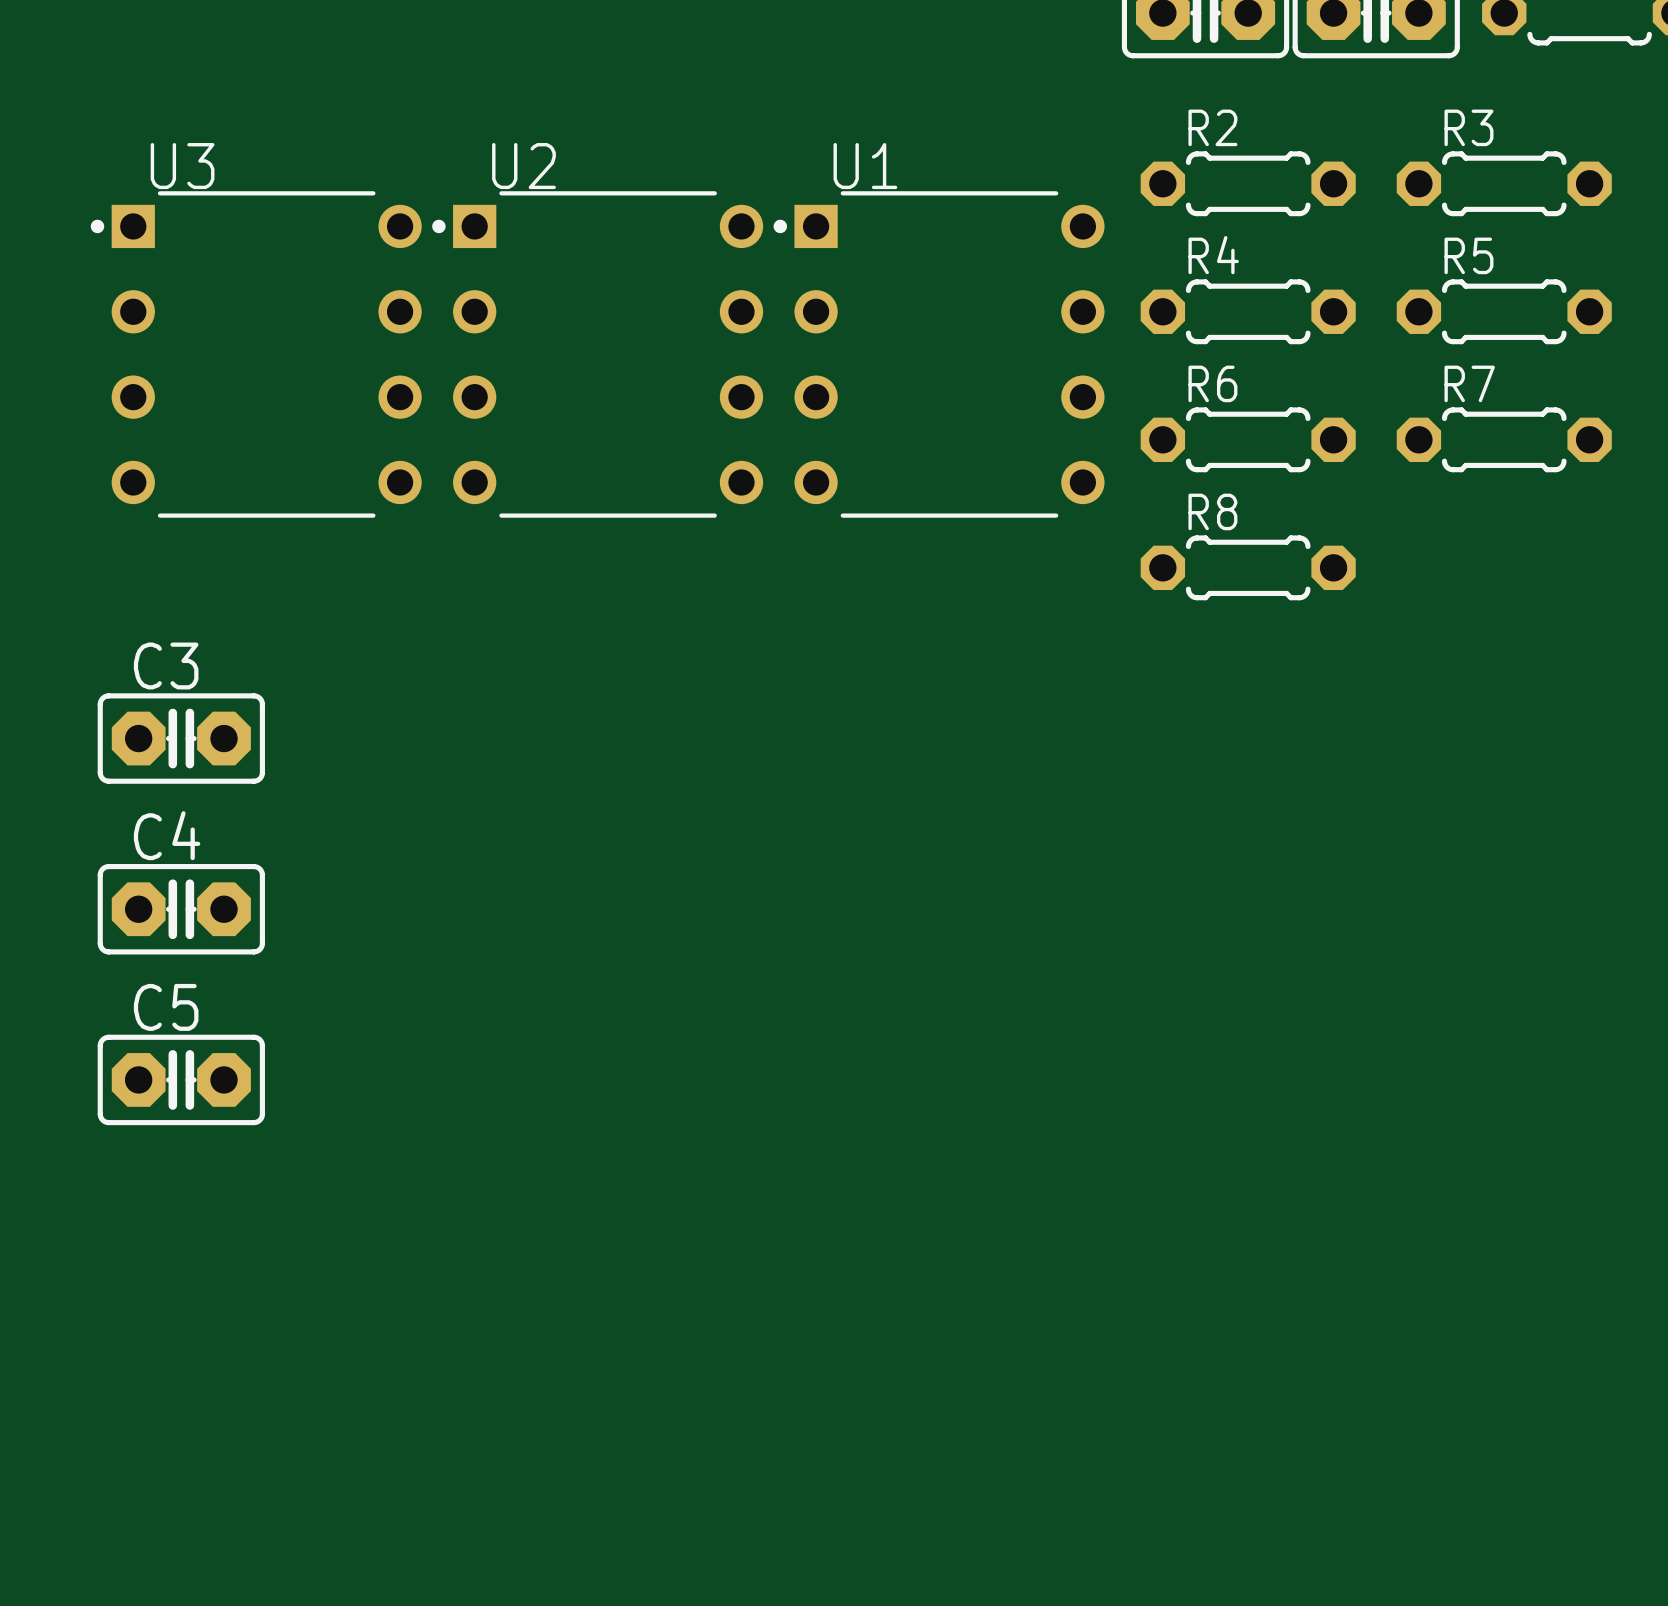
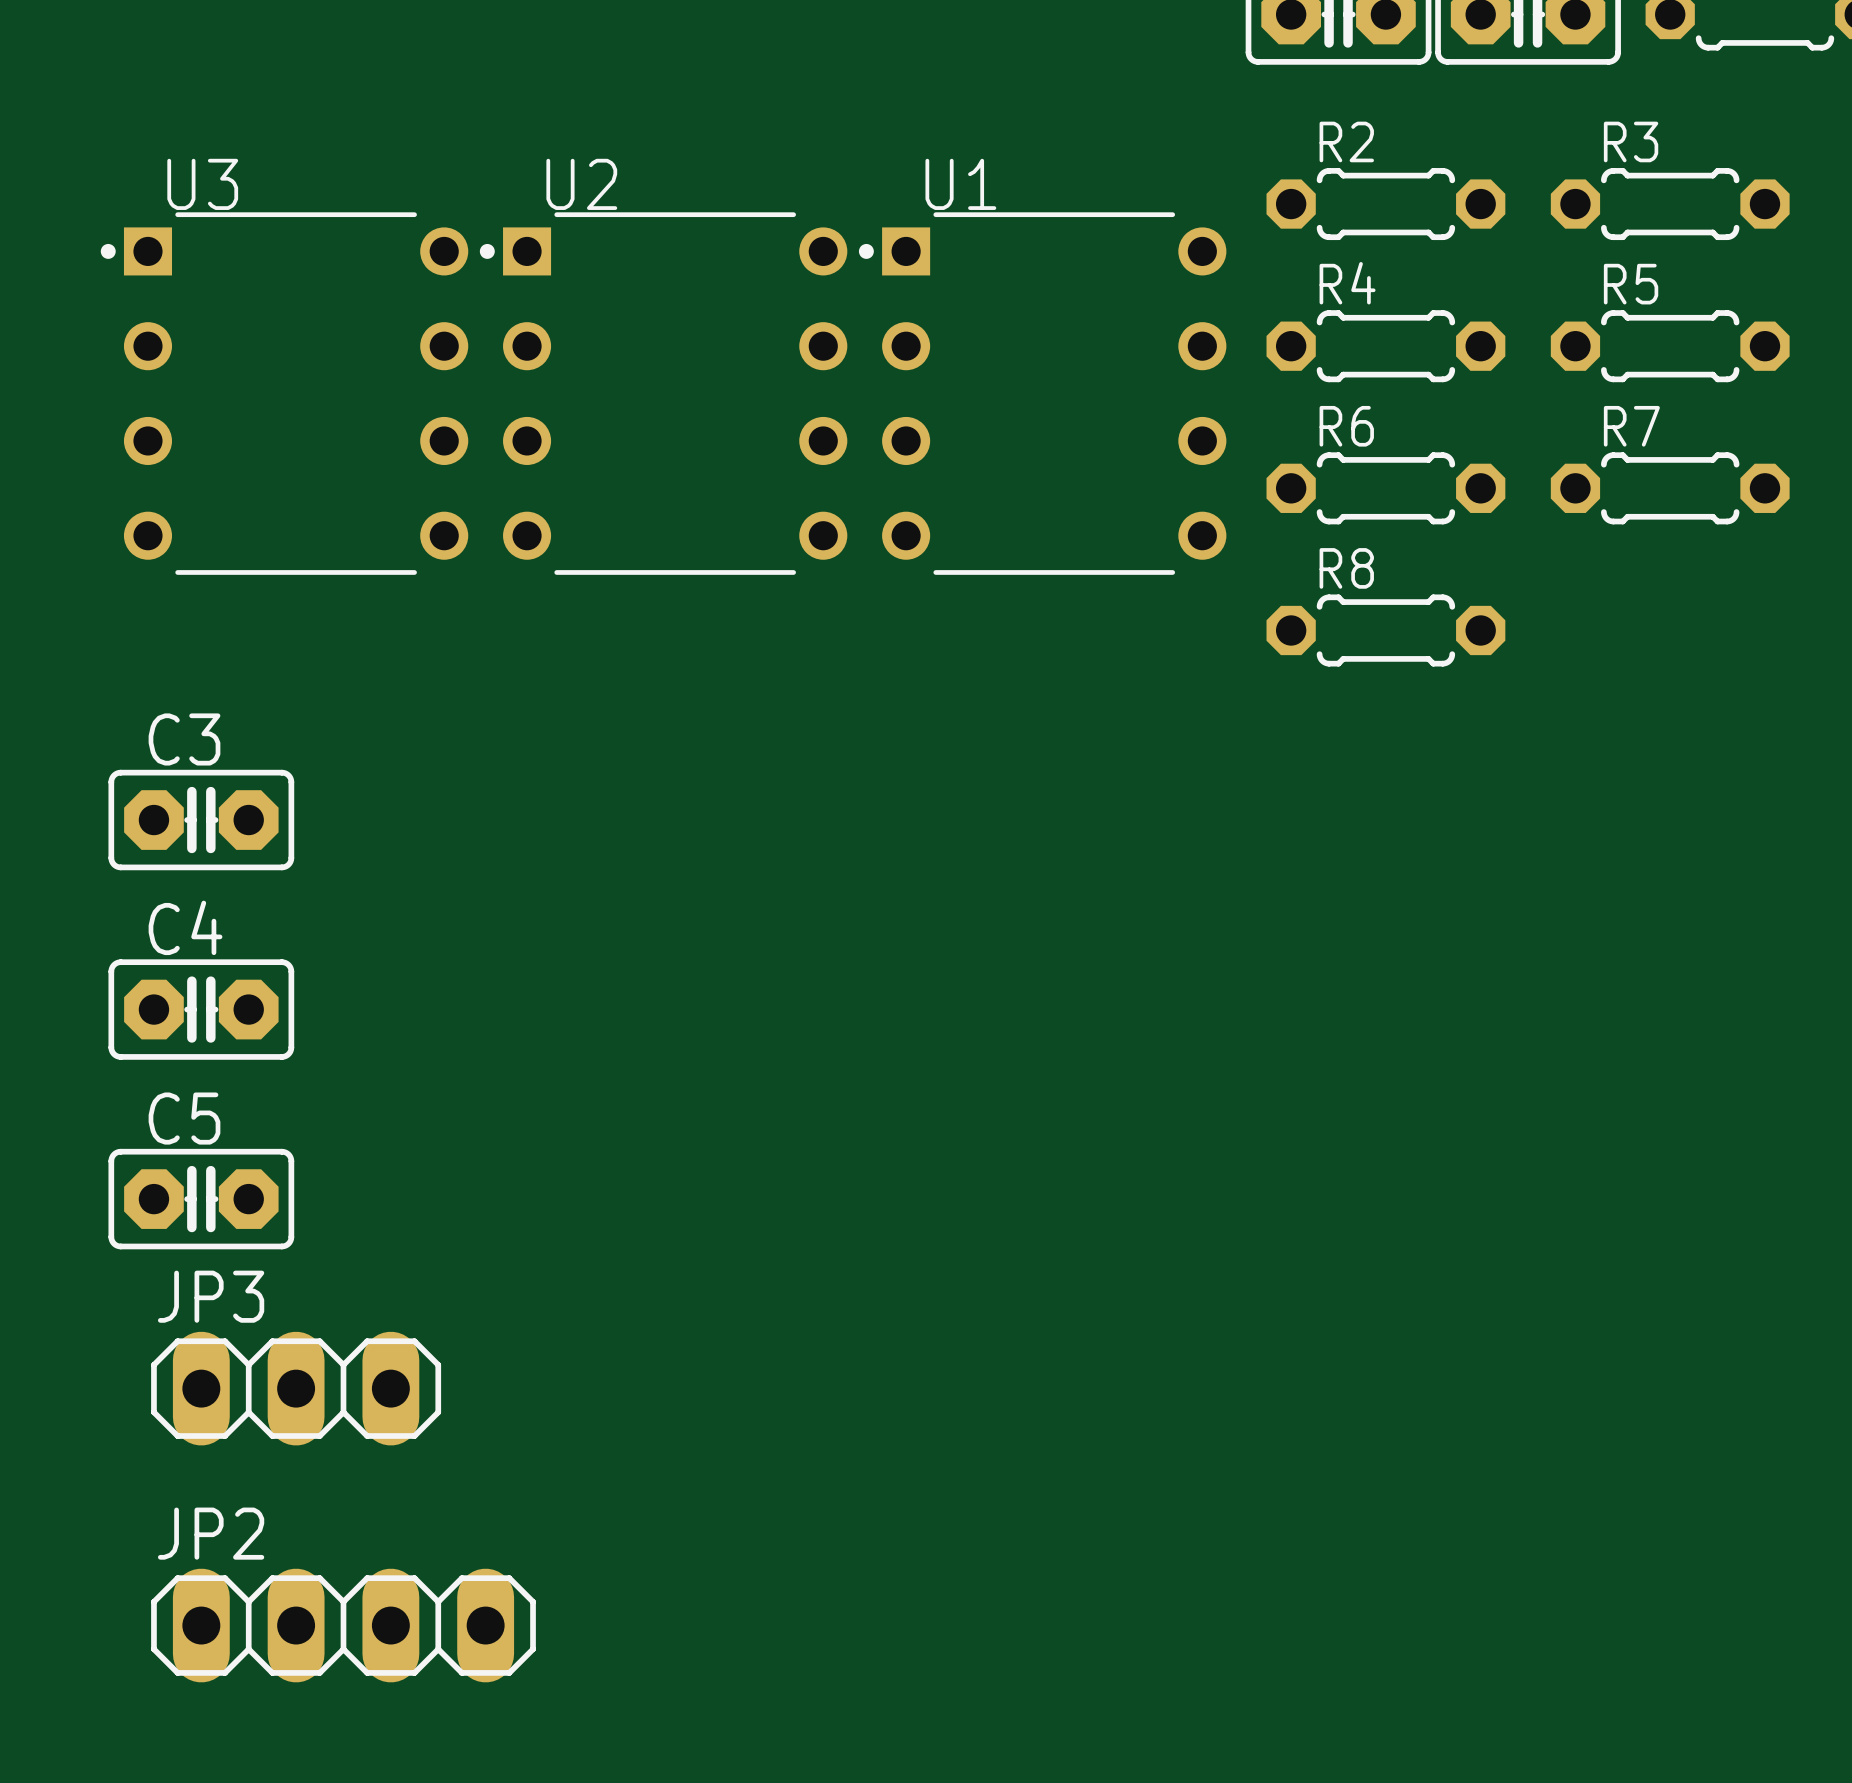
JP3: none -> (296, 1388)
JP2: none -> (343, 1625)

